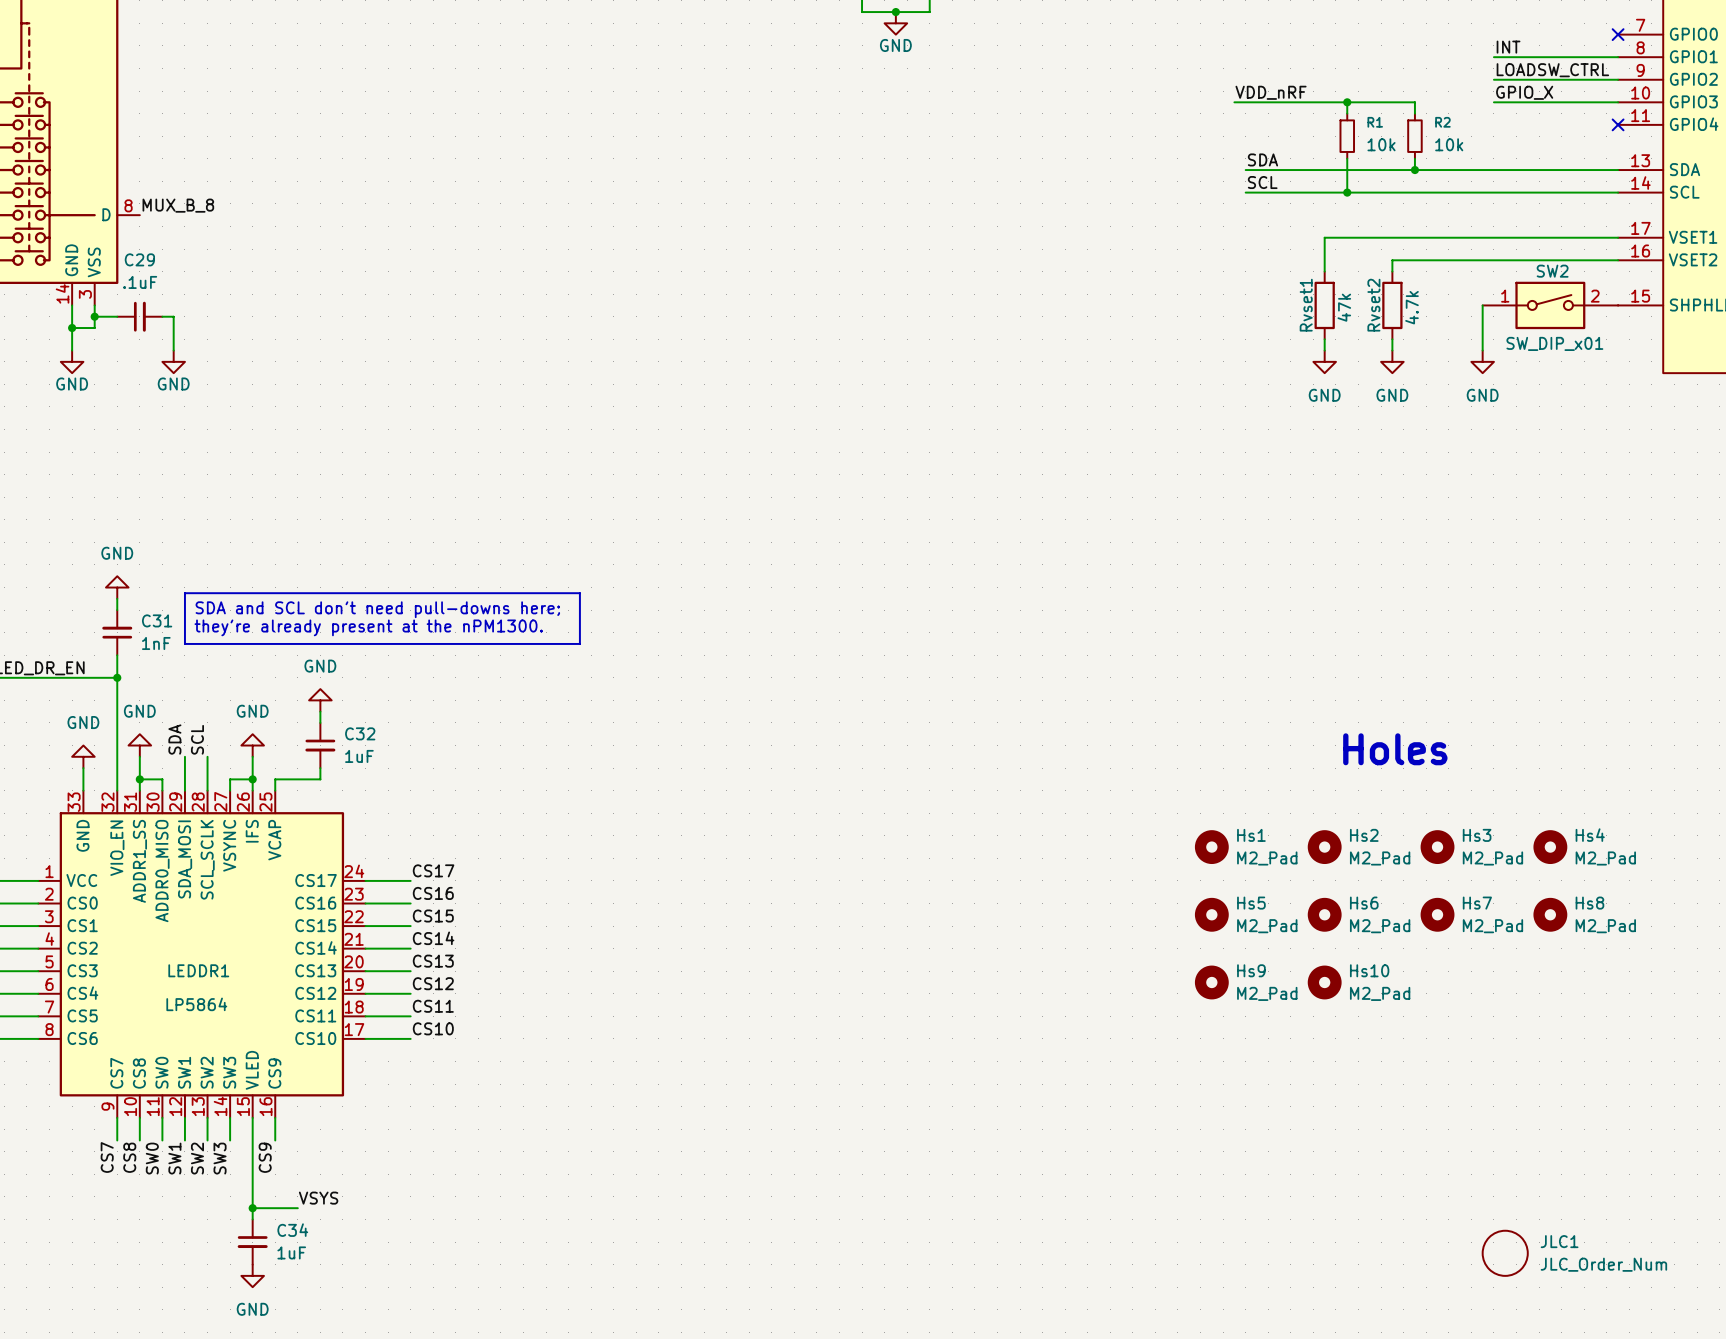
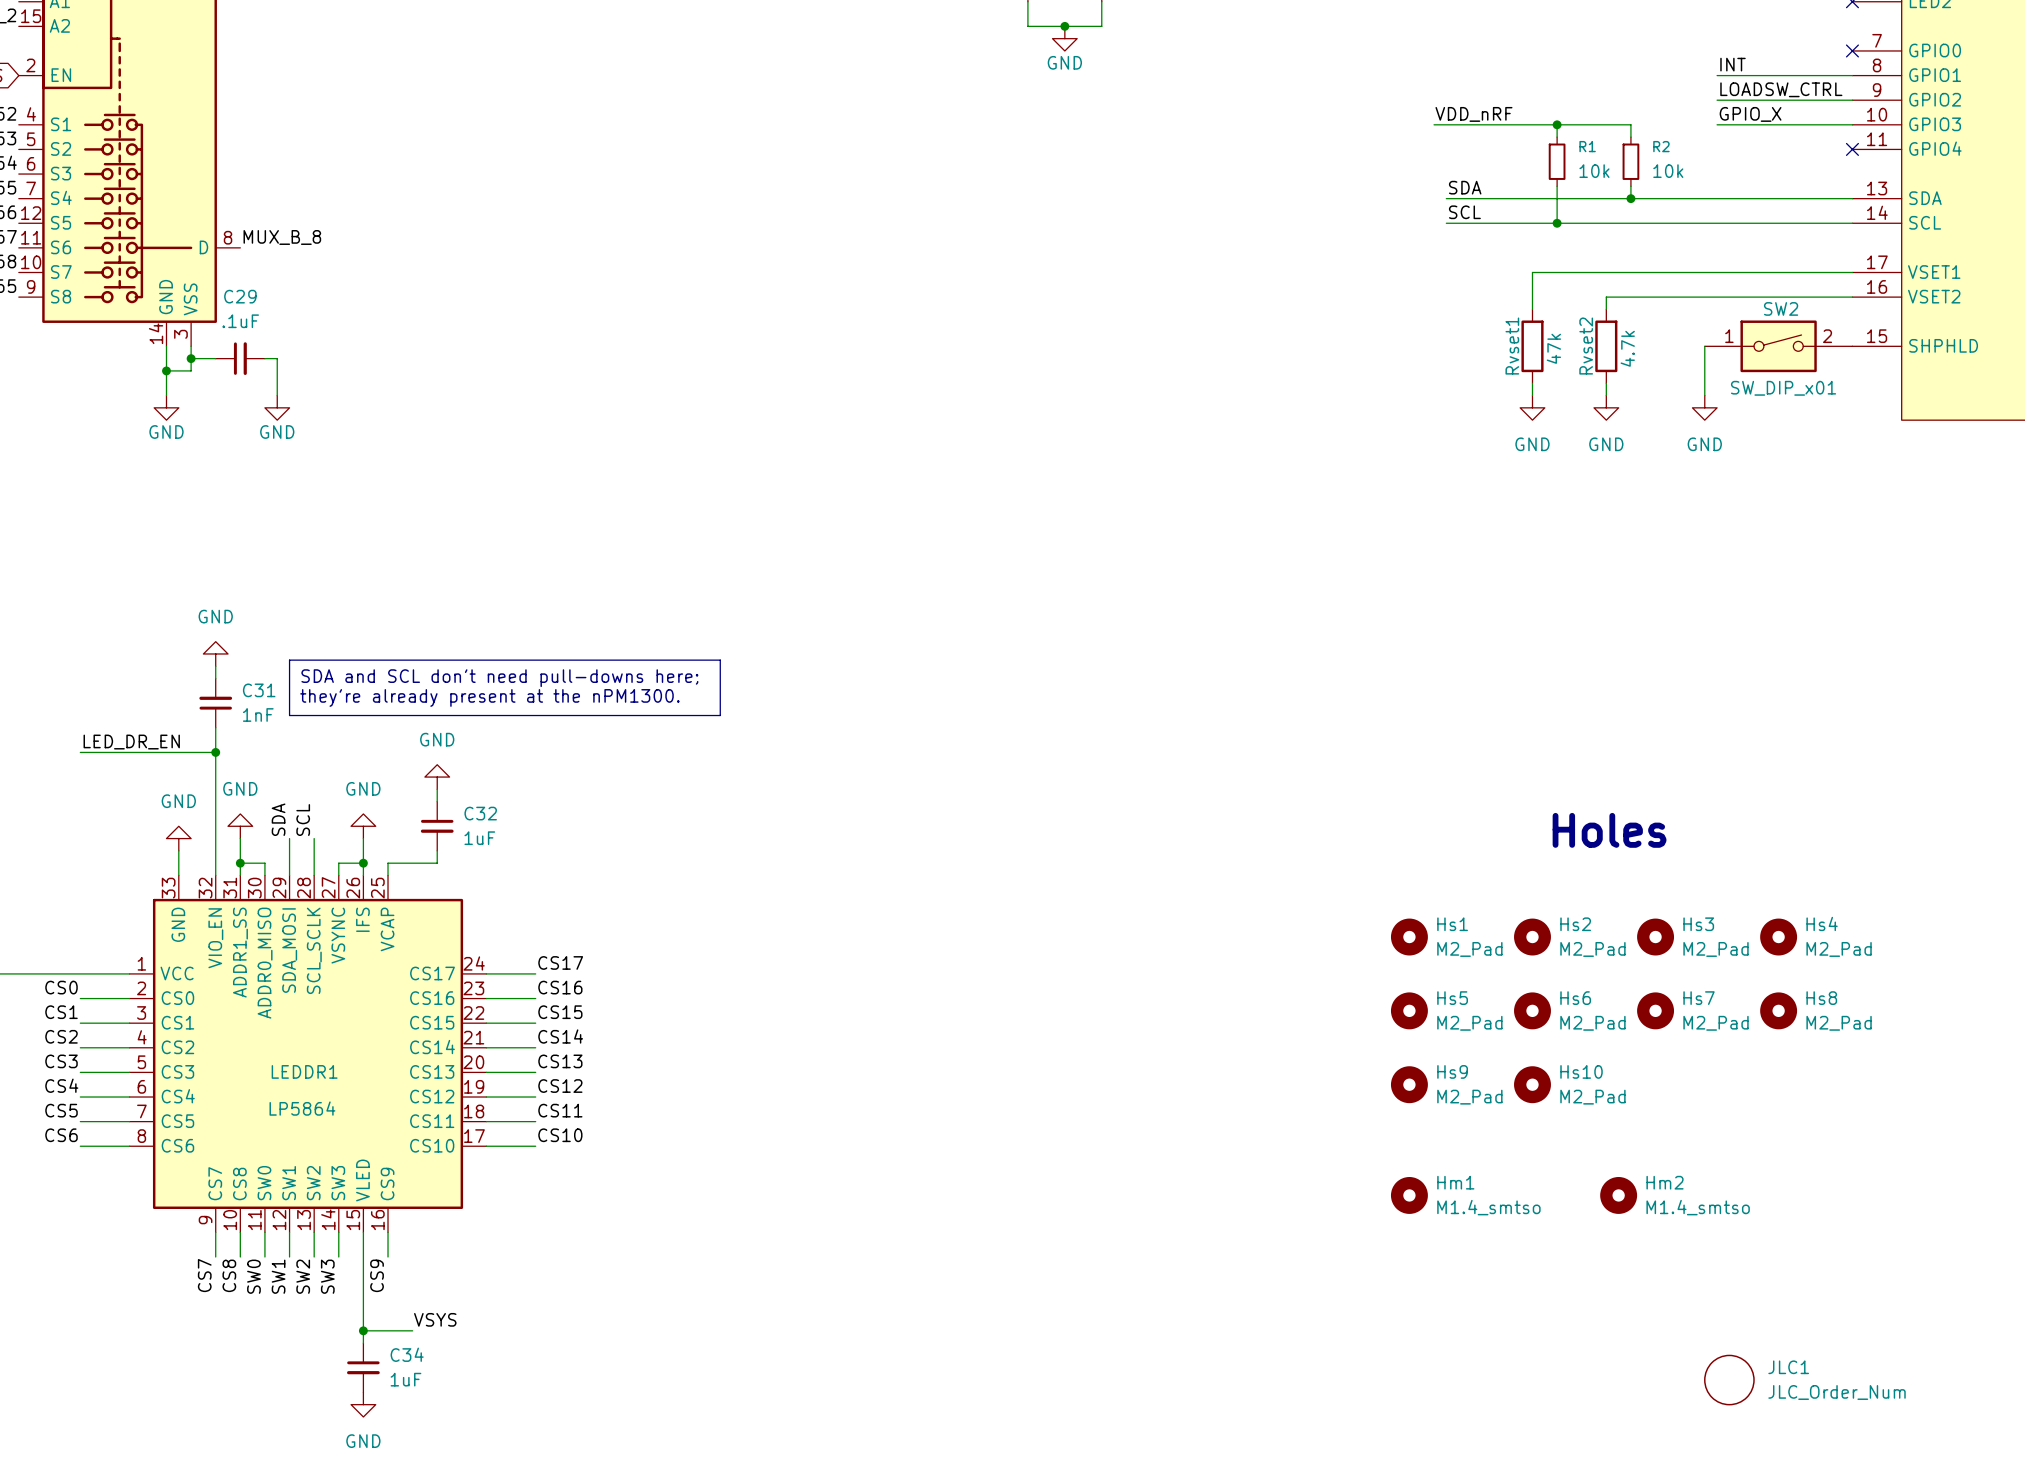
Hm1: none -> M1.4_smtso (1409, 1195)
Hm2: none -> M1.4_smtso (1618, 1195)

